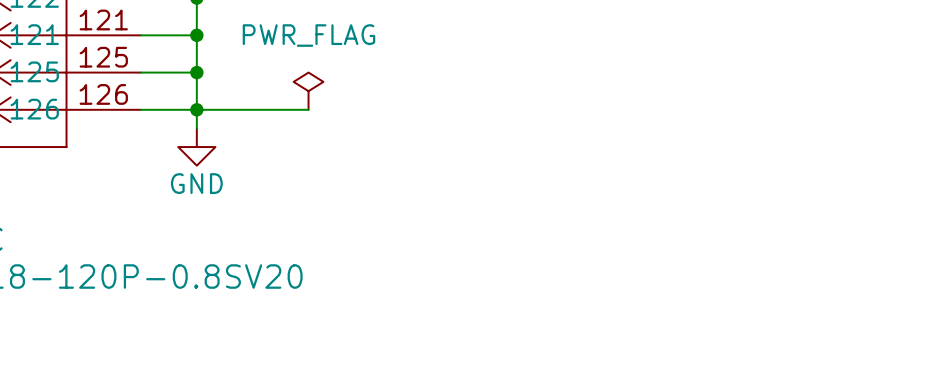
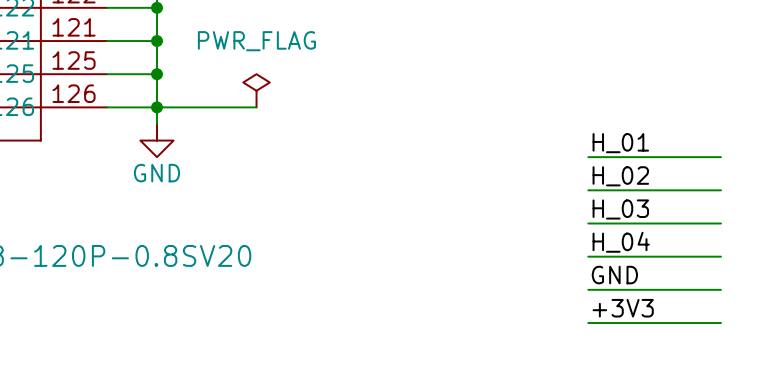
label: none -> H_01 (620, 143)
wire: none -> (588, 157) (721, 157)
label: none -> H_02 (620, 176)
wire: none -> (588, 190) (721, 190)
label: none -> H_03 (620, 209)
wire: none -> (588, 223) (721, 223)
label: none -> H_04 (621, 242)
wire: none -> (588, 256) (721, 256)
label: none -> GND (614, 275)
wire: none -> (588, 289) (721, 289)
label: none -> +3V3 (623, 308)
wire: none -> (588, 323) (721, 323)

